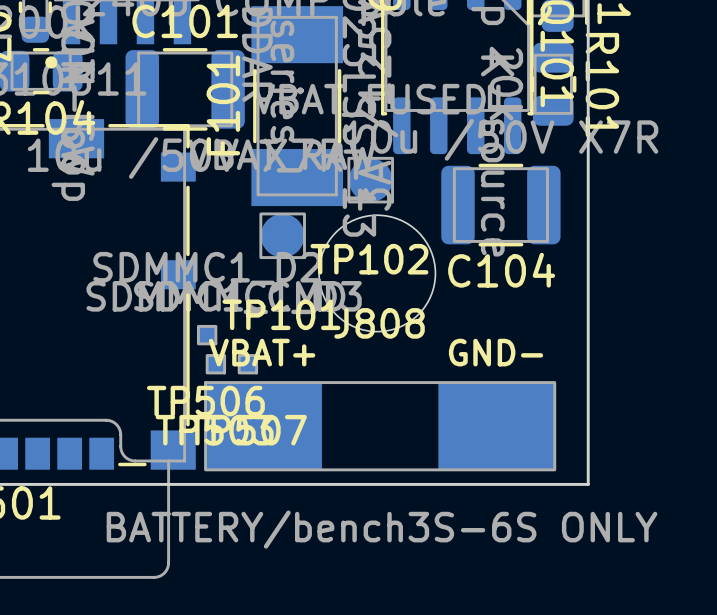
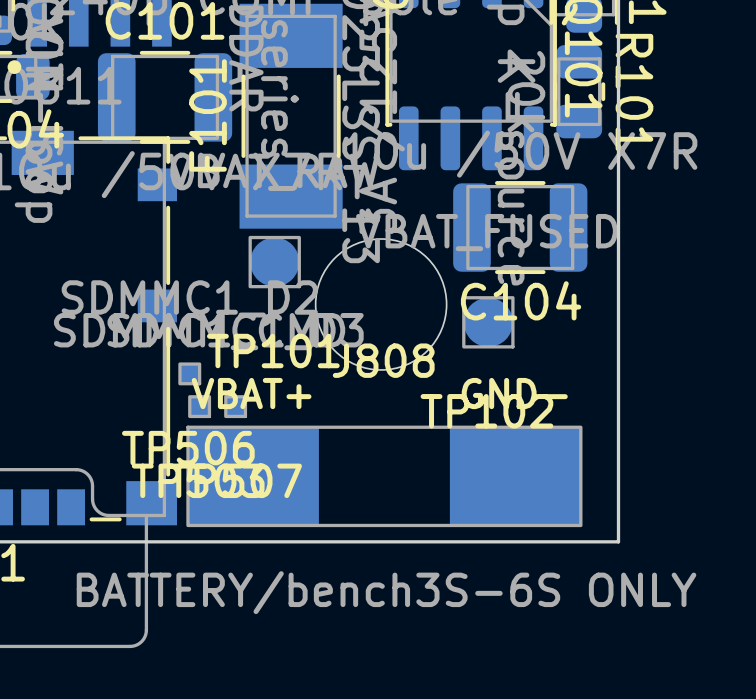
TP102 position: (370, 180) -> (488, 322)

